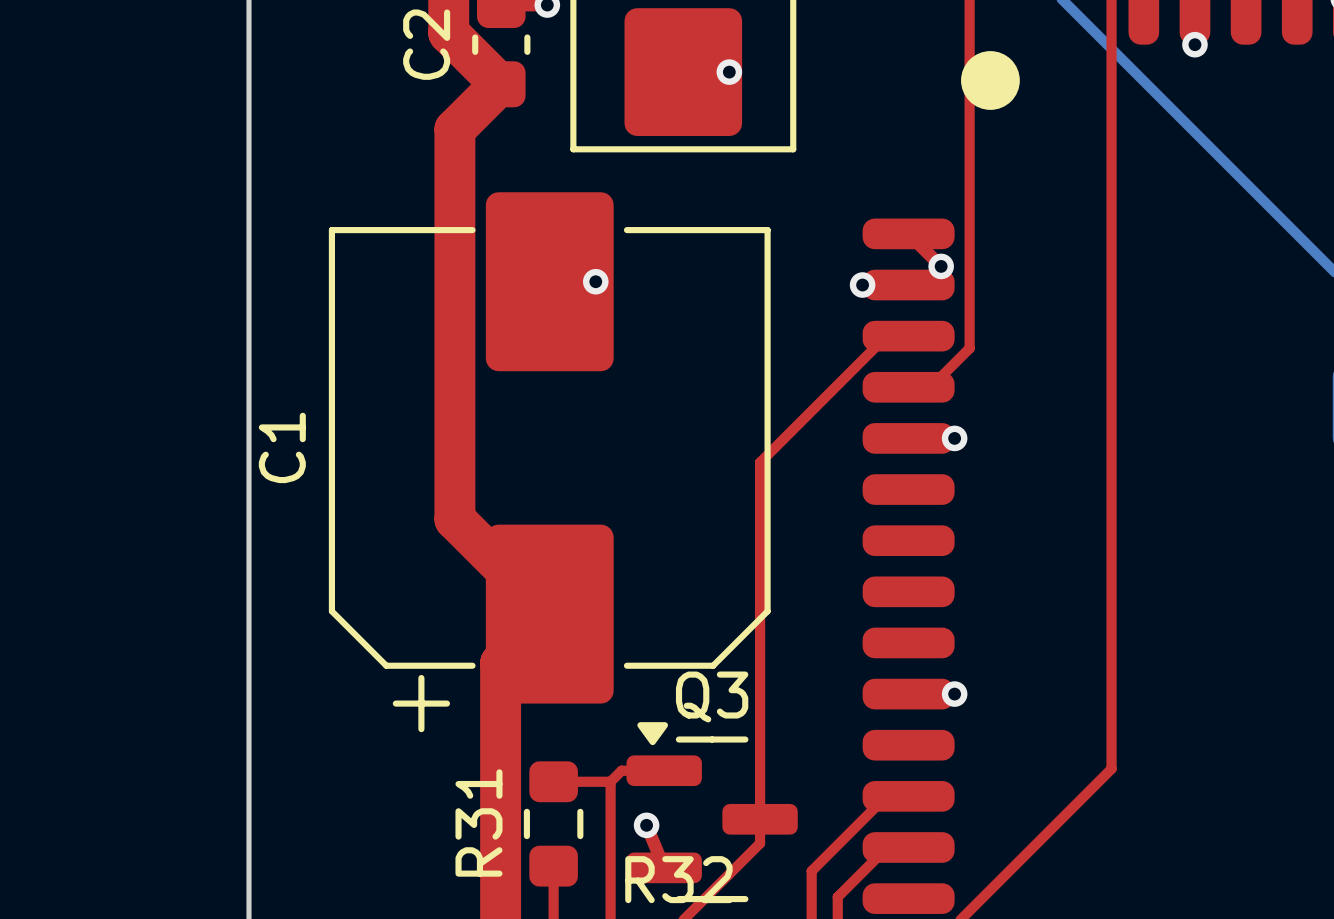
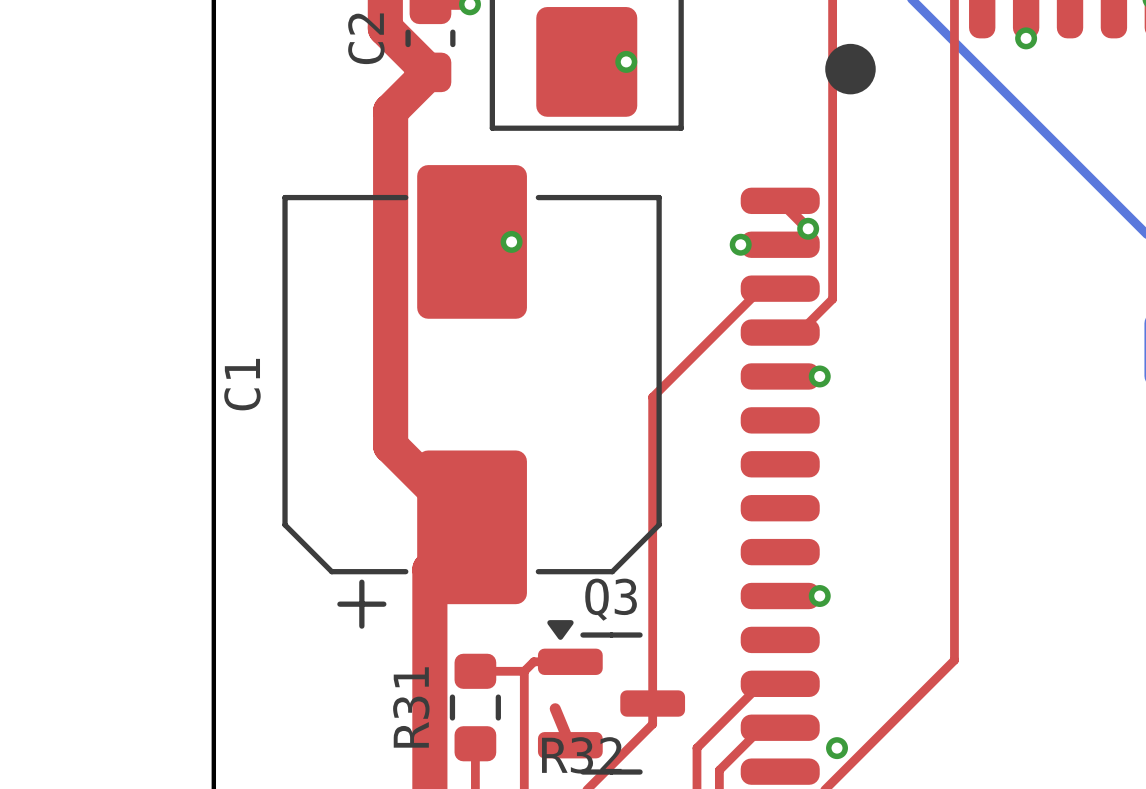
via: (646, 825) -> none
via: none -> (837, 748)

